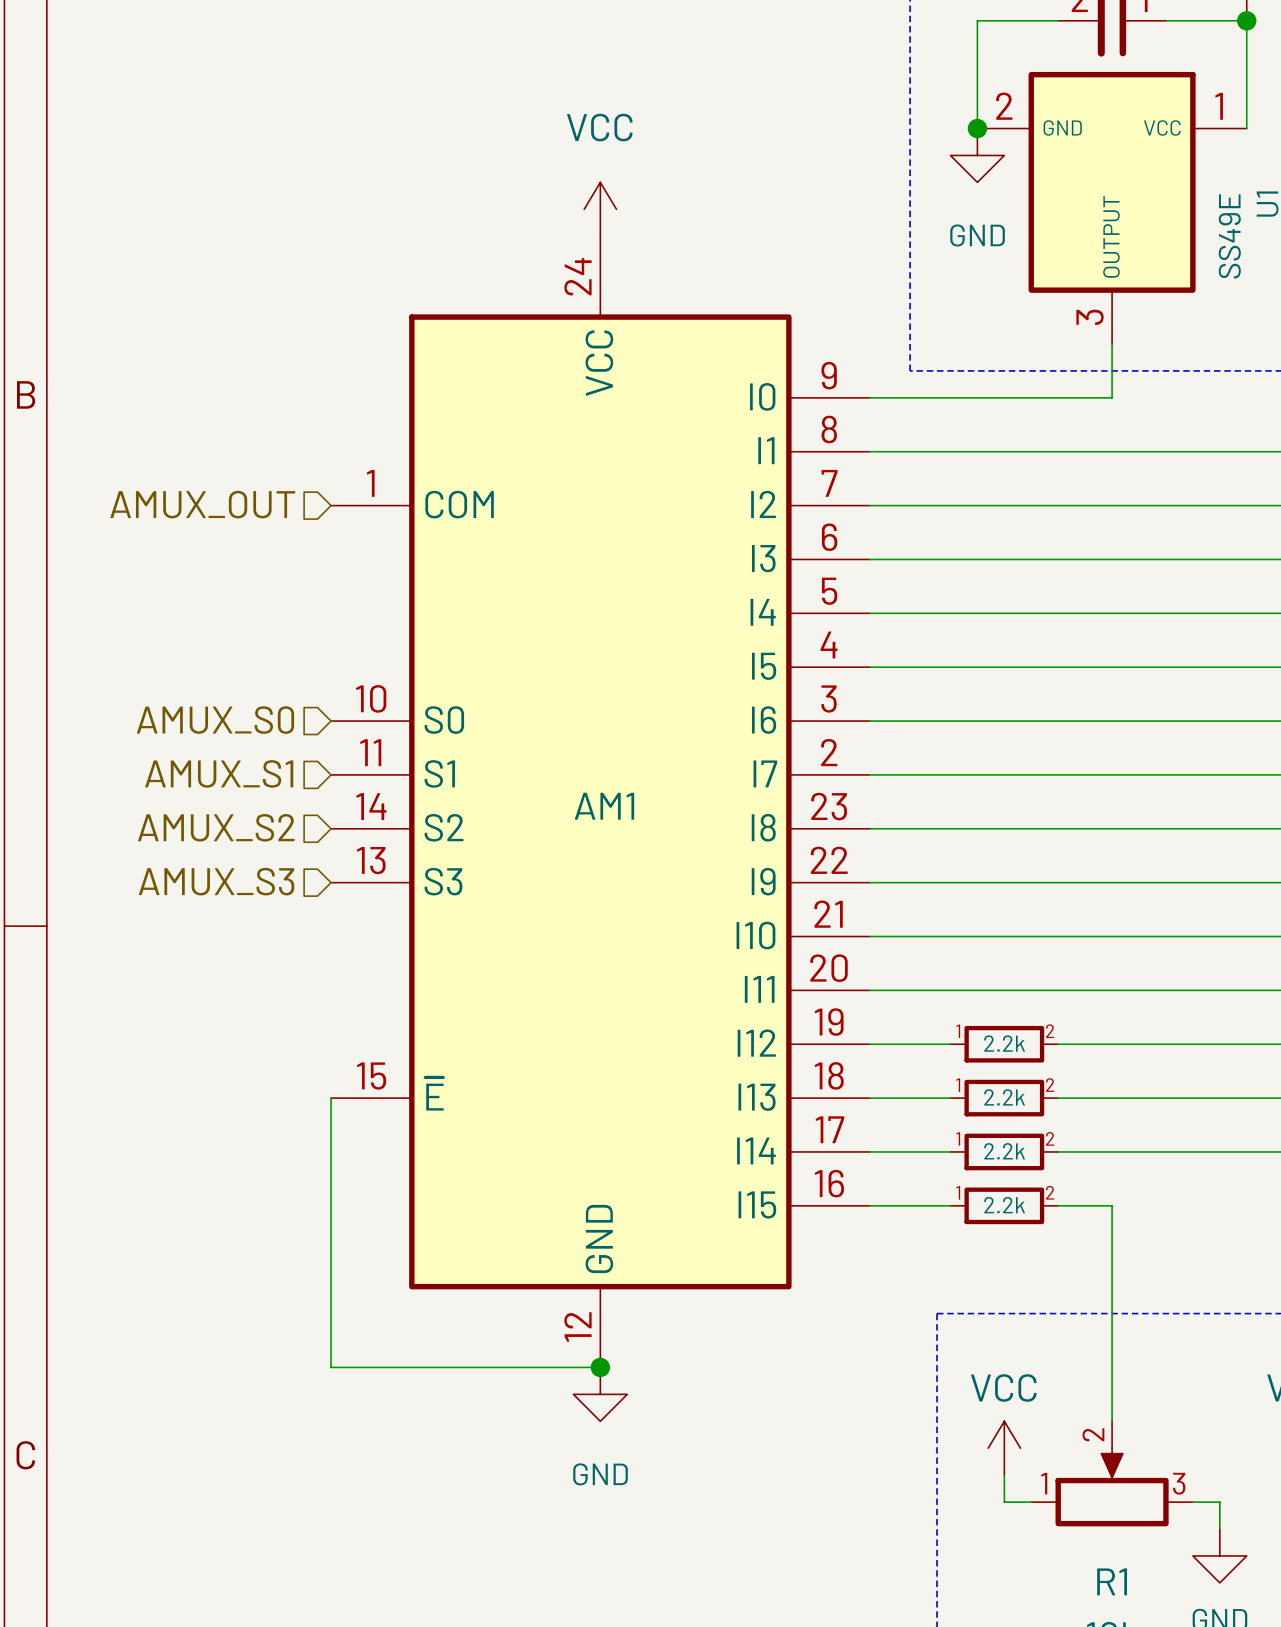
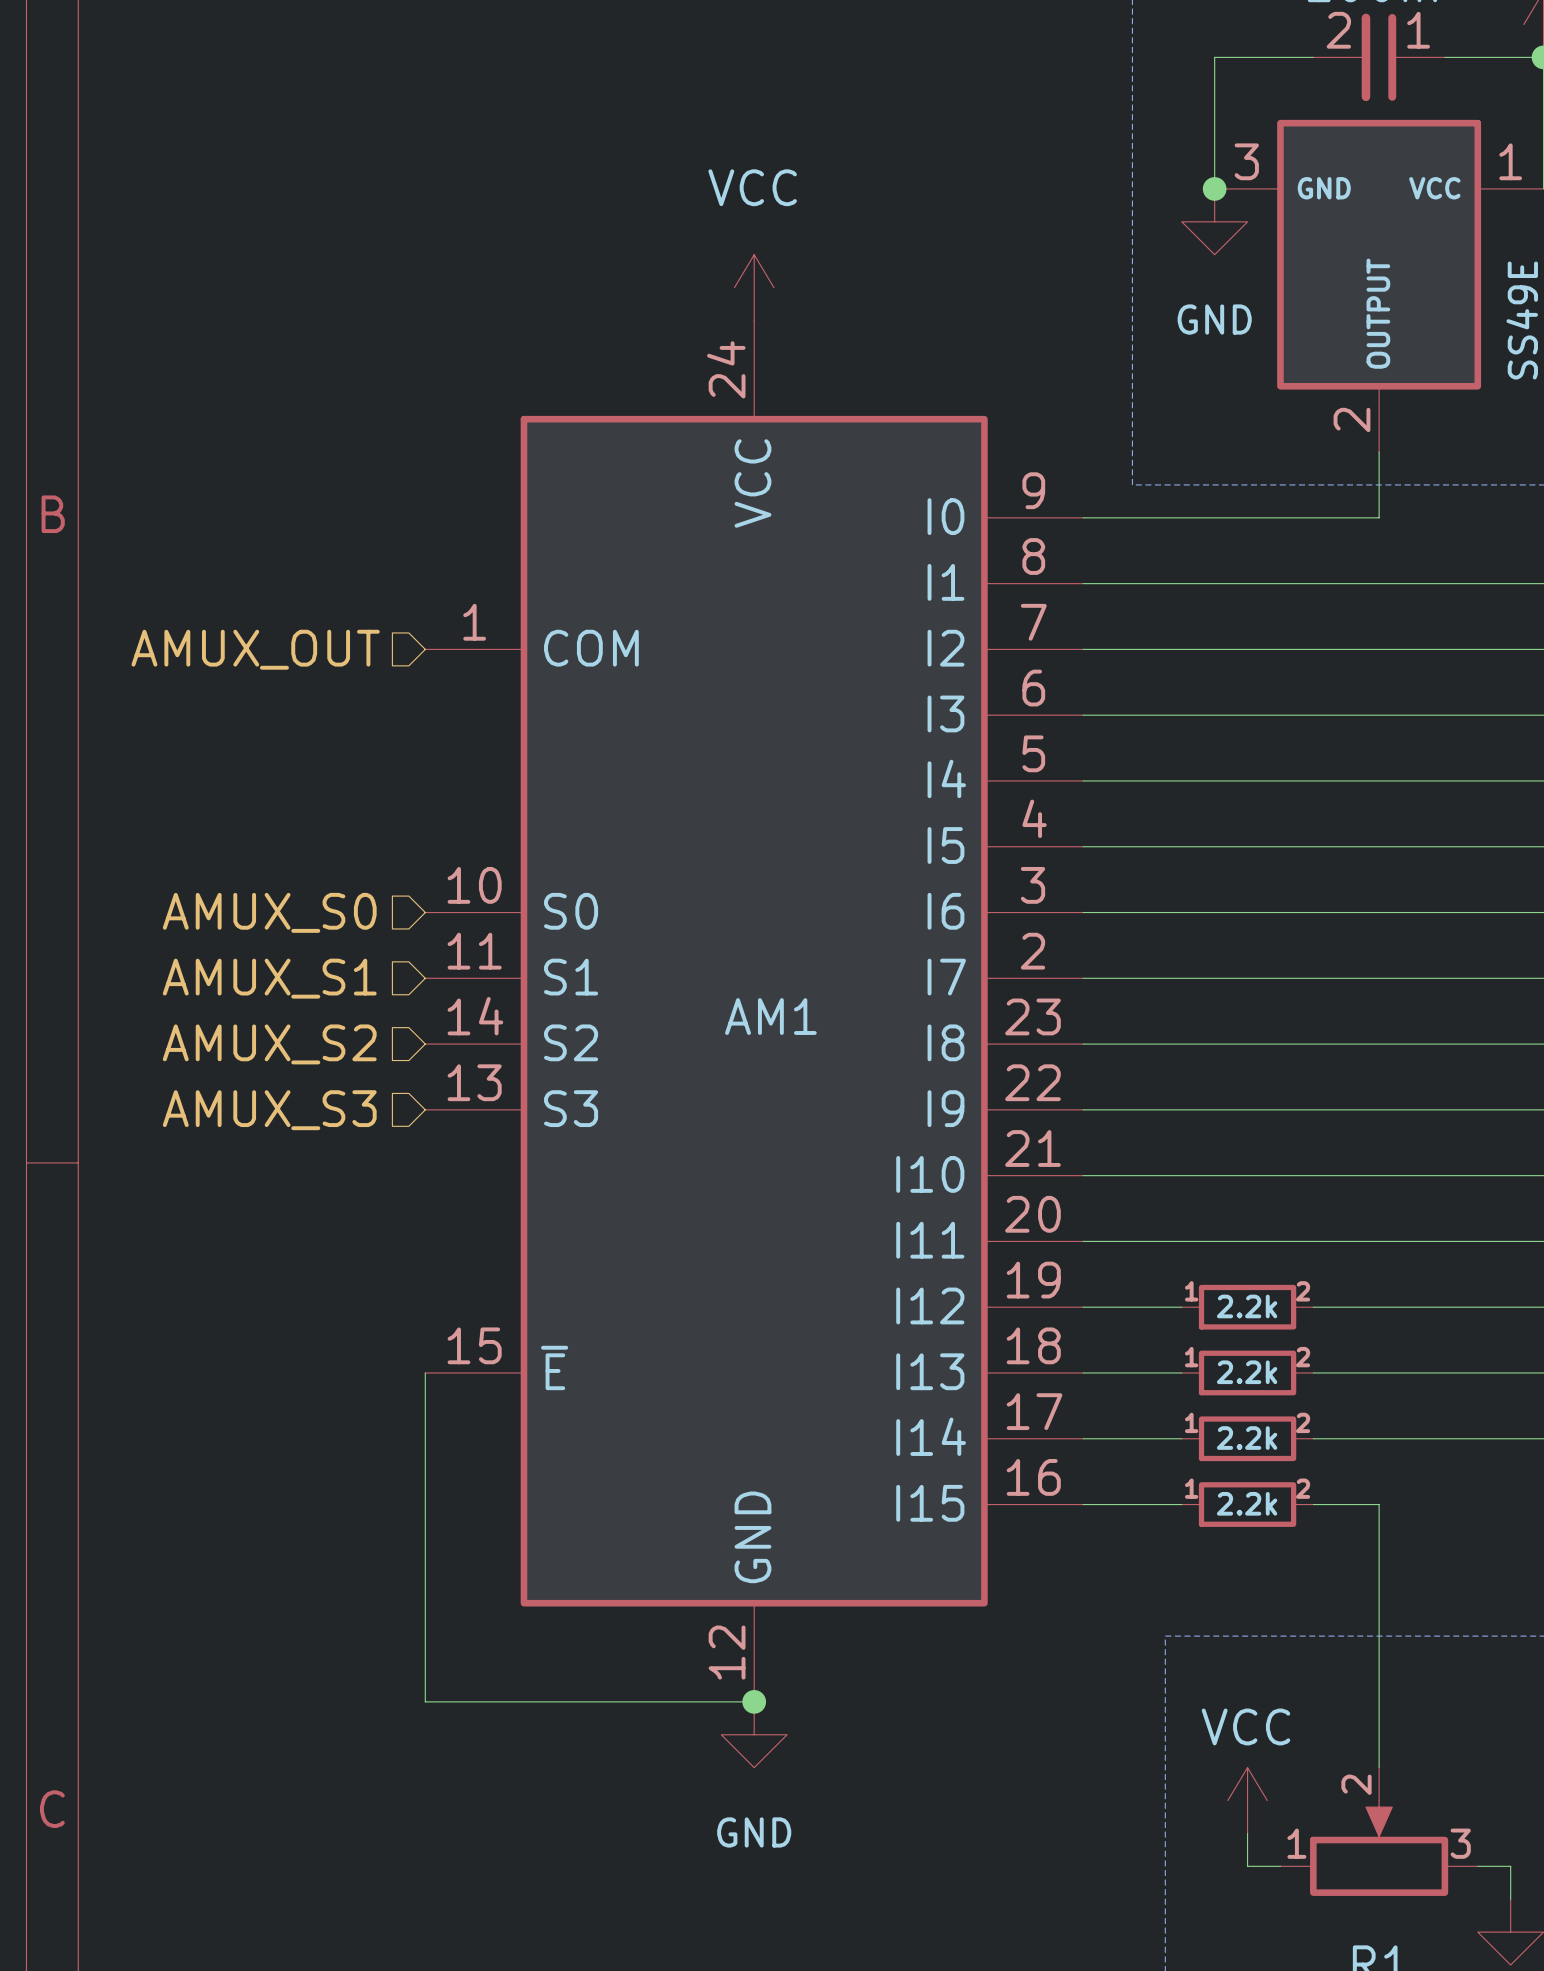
U1 pin number: 2 (1004, 106) -> 3 (1246, 161)
U1 pin number: 3 (1090, 317) -> 2 (1351, 419)

